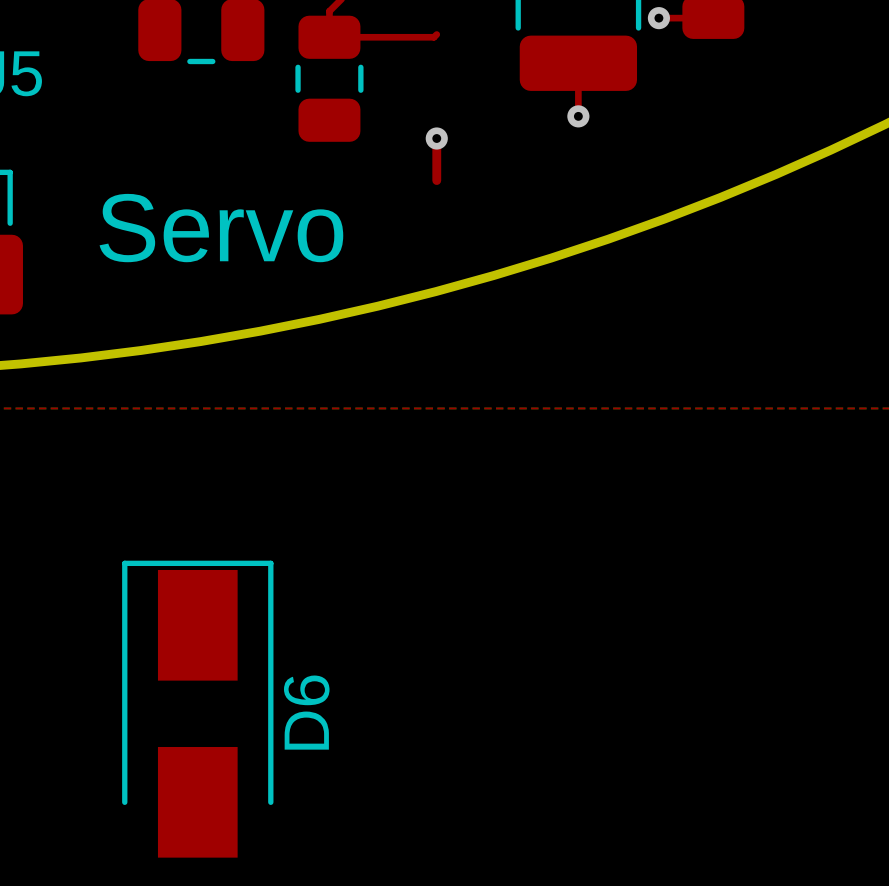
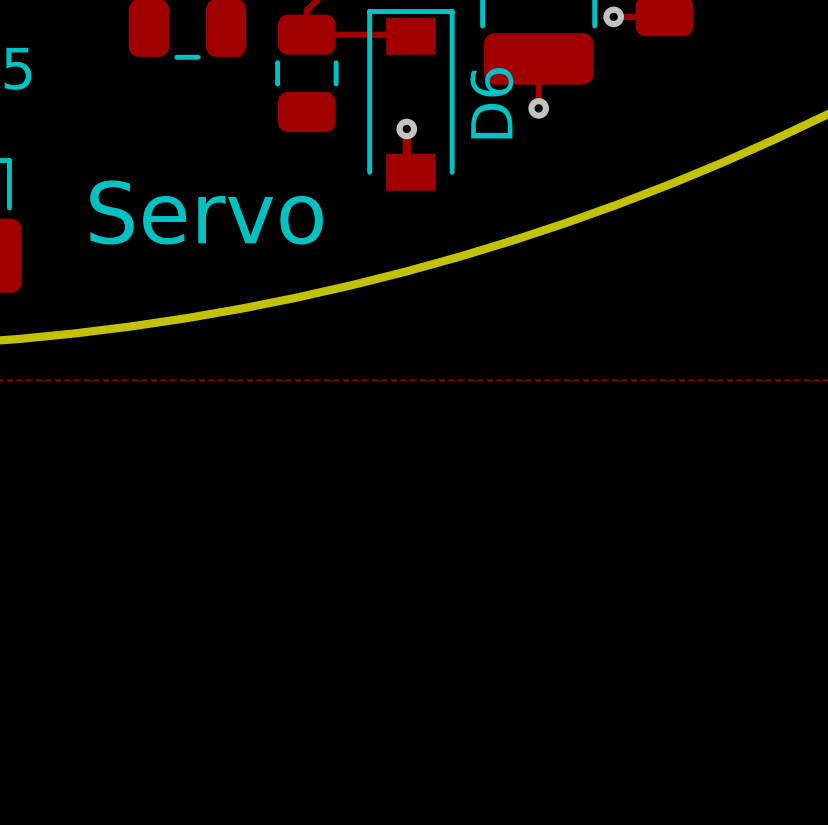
D6 footprint: [122, 560, 274, 858] -> [367, 9, 455, 191]

